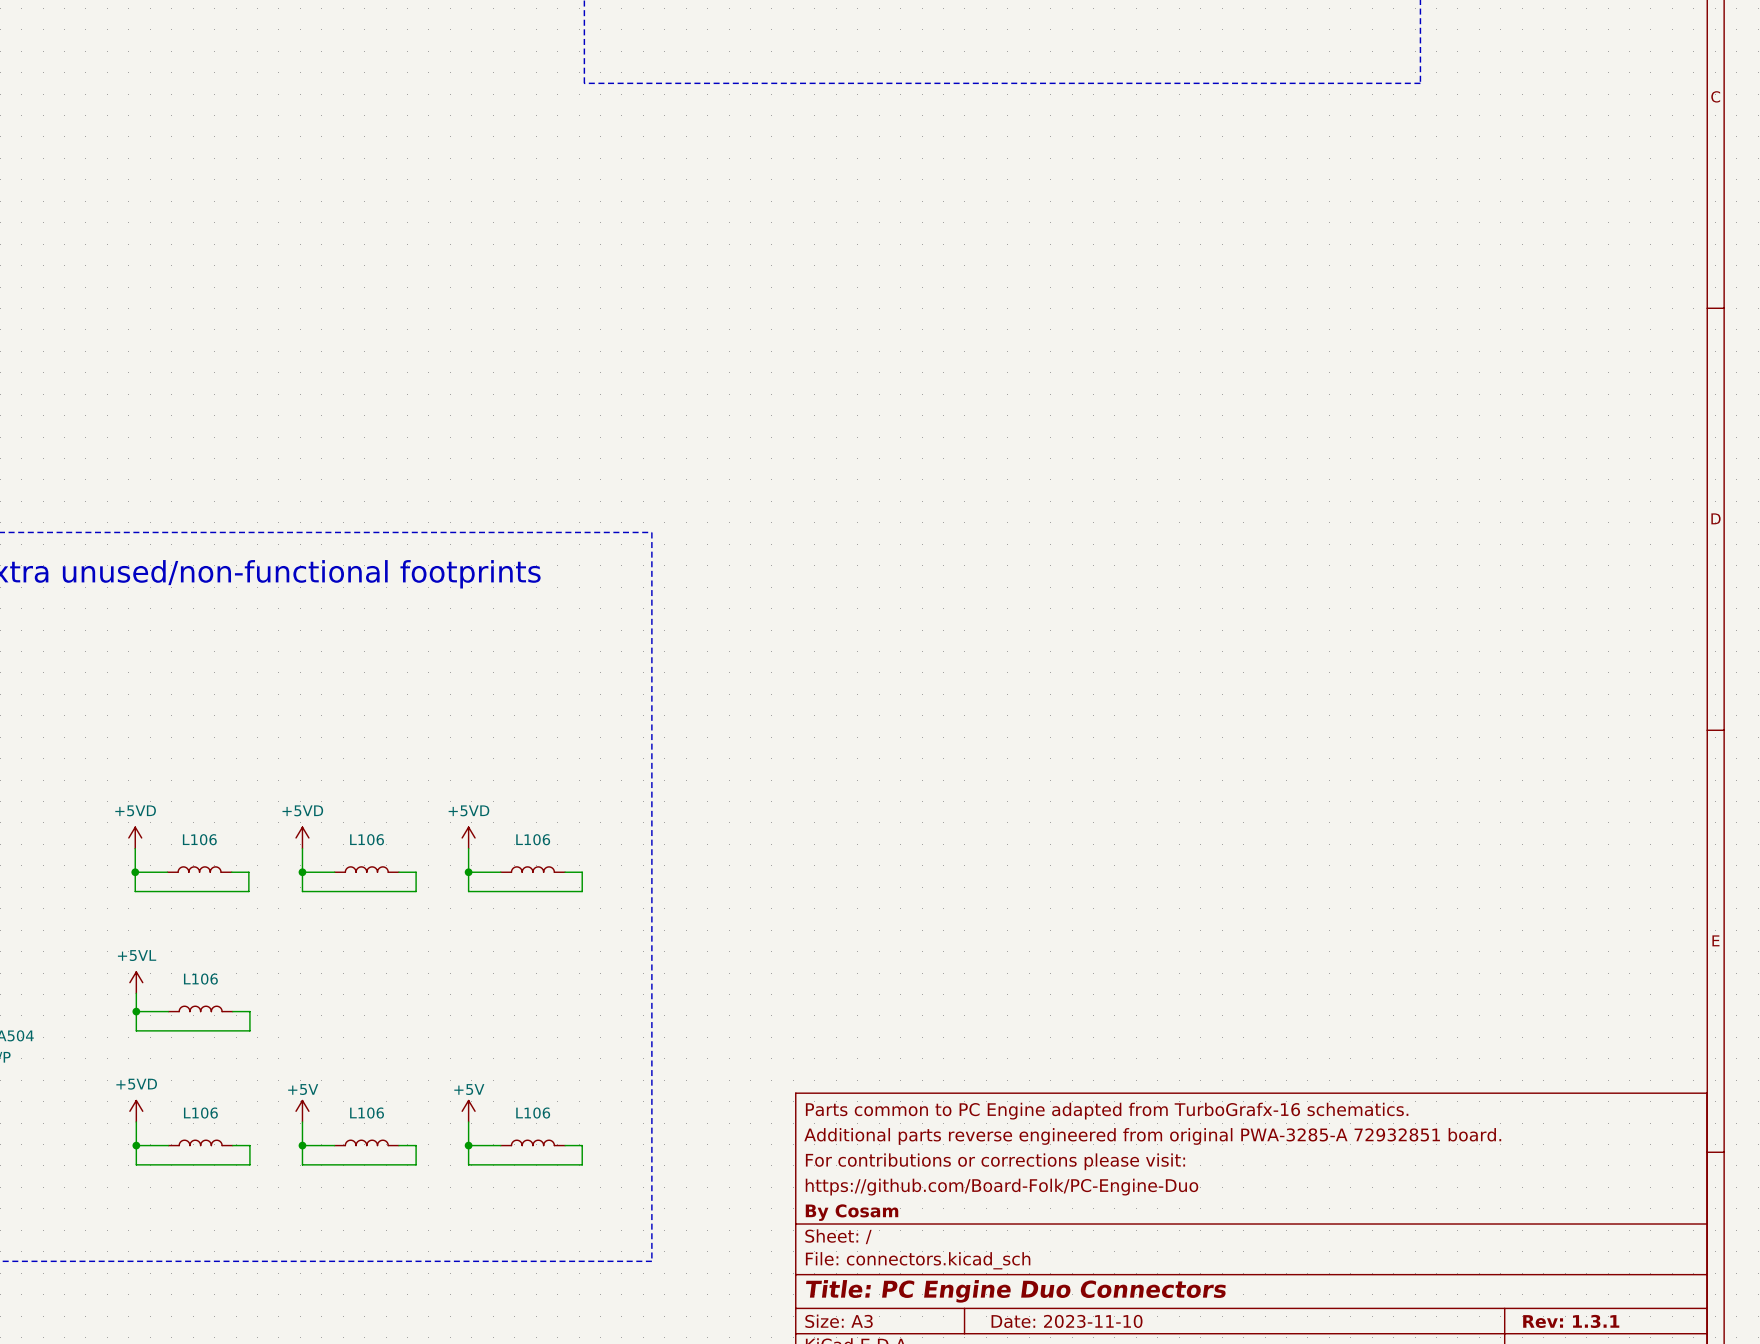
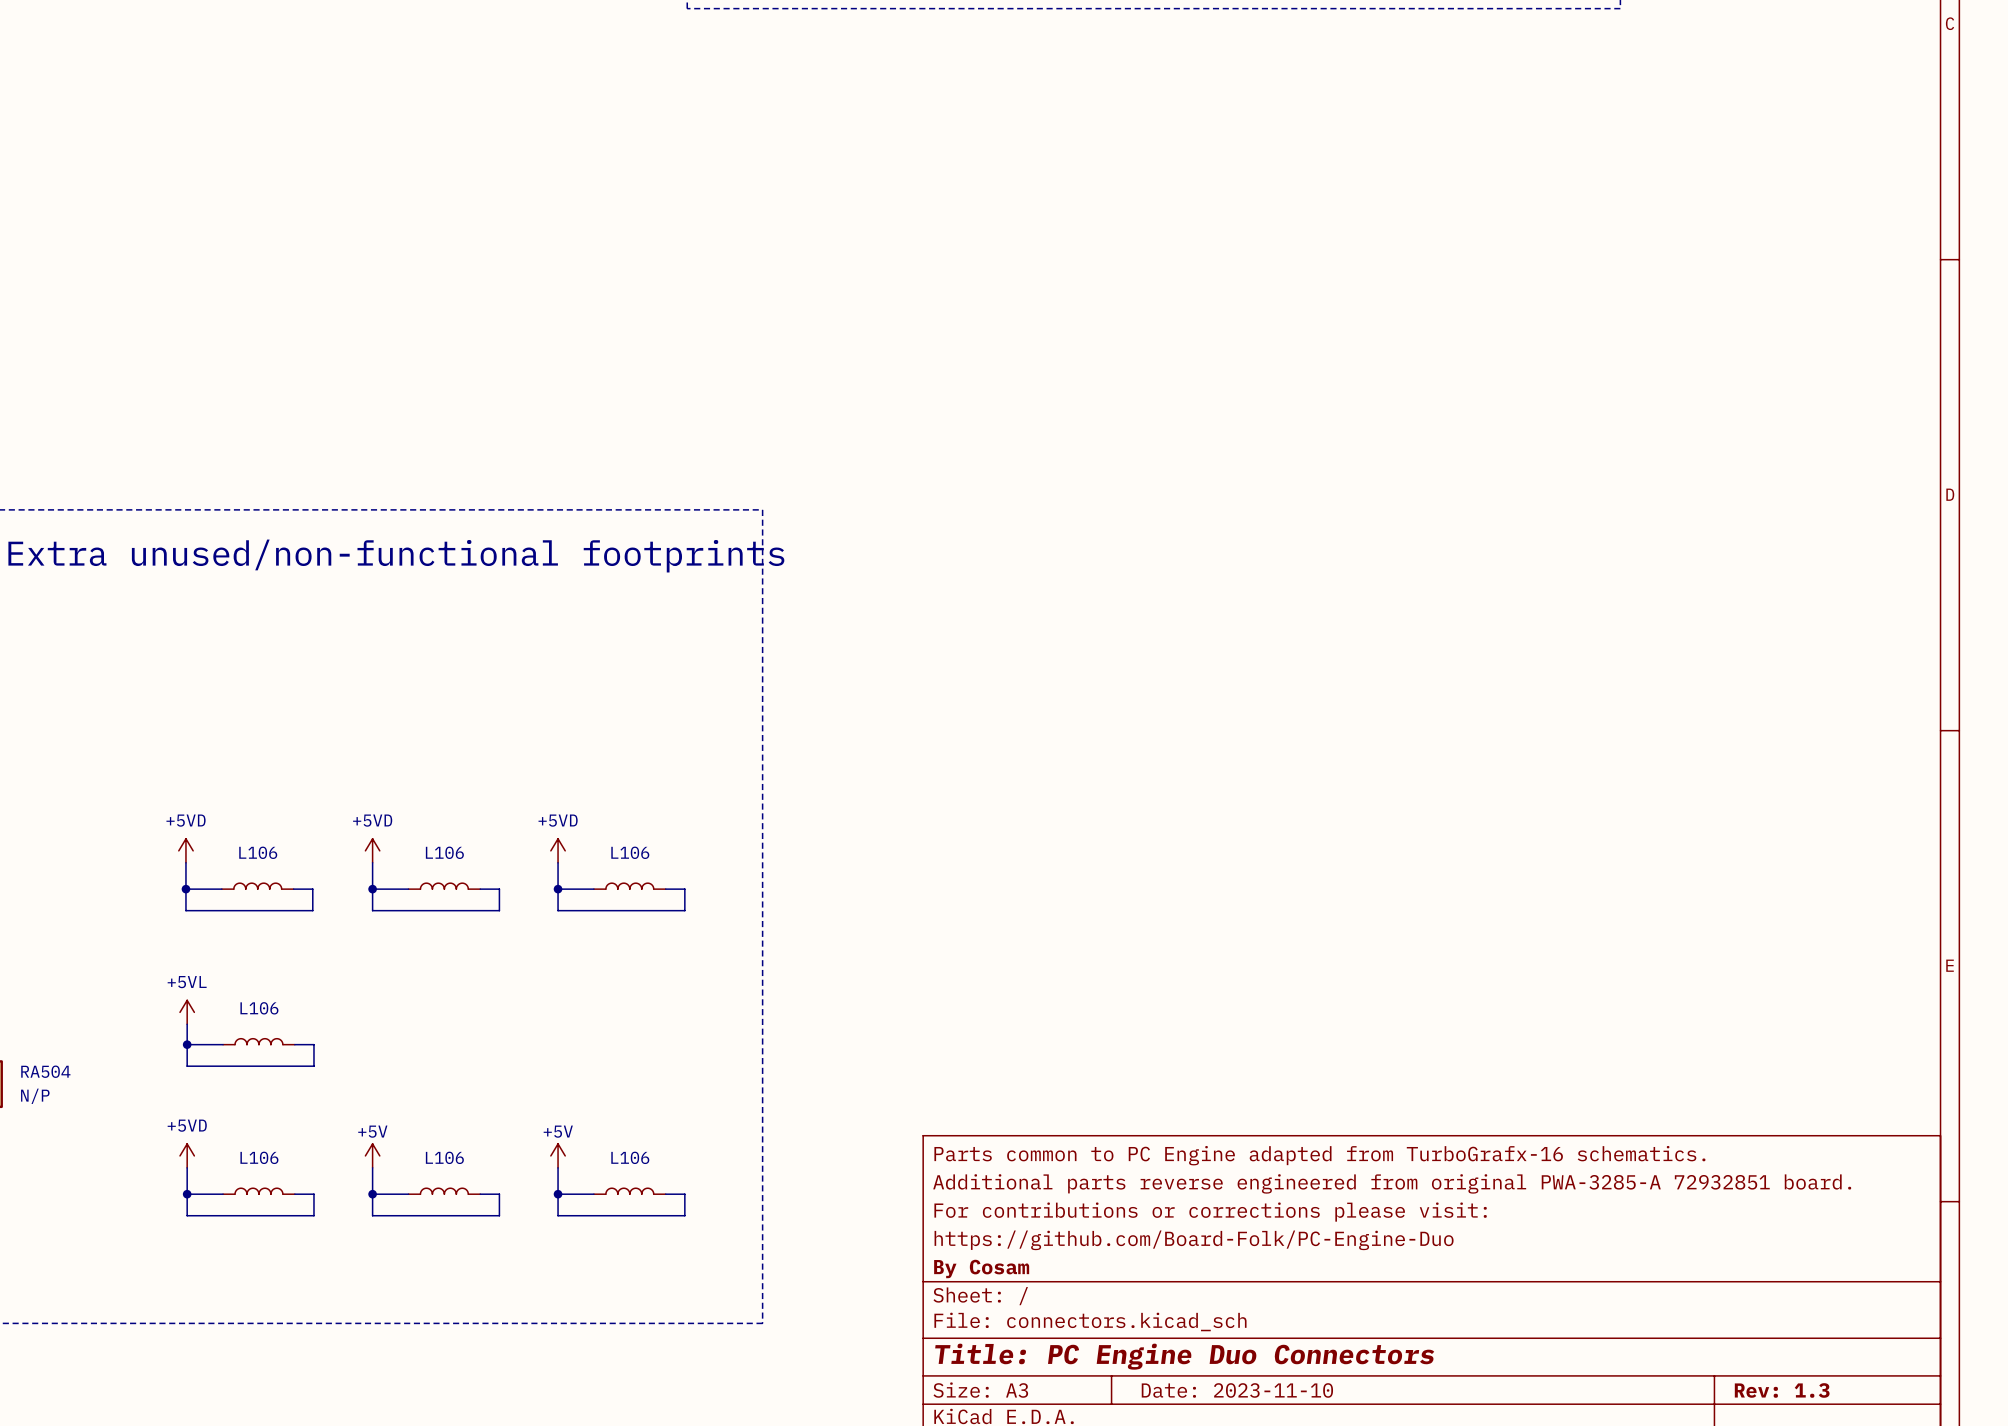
title block: Rev: 1.3.1 (1571, 1321) -> Rev: 1.3 (1782, 1390)

